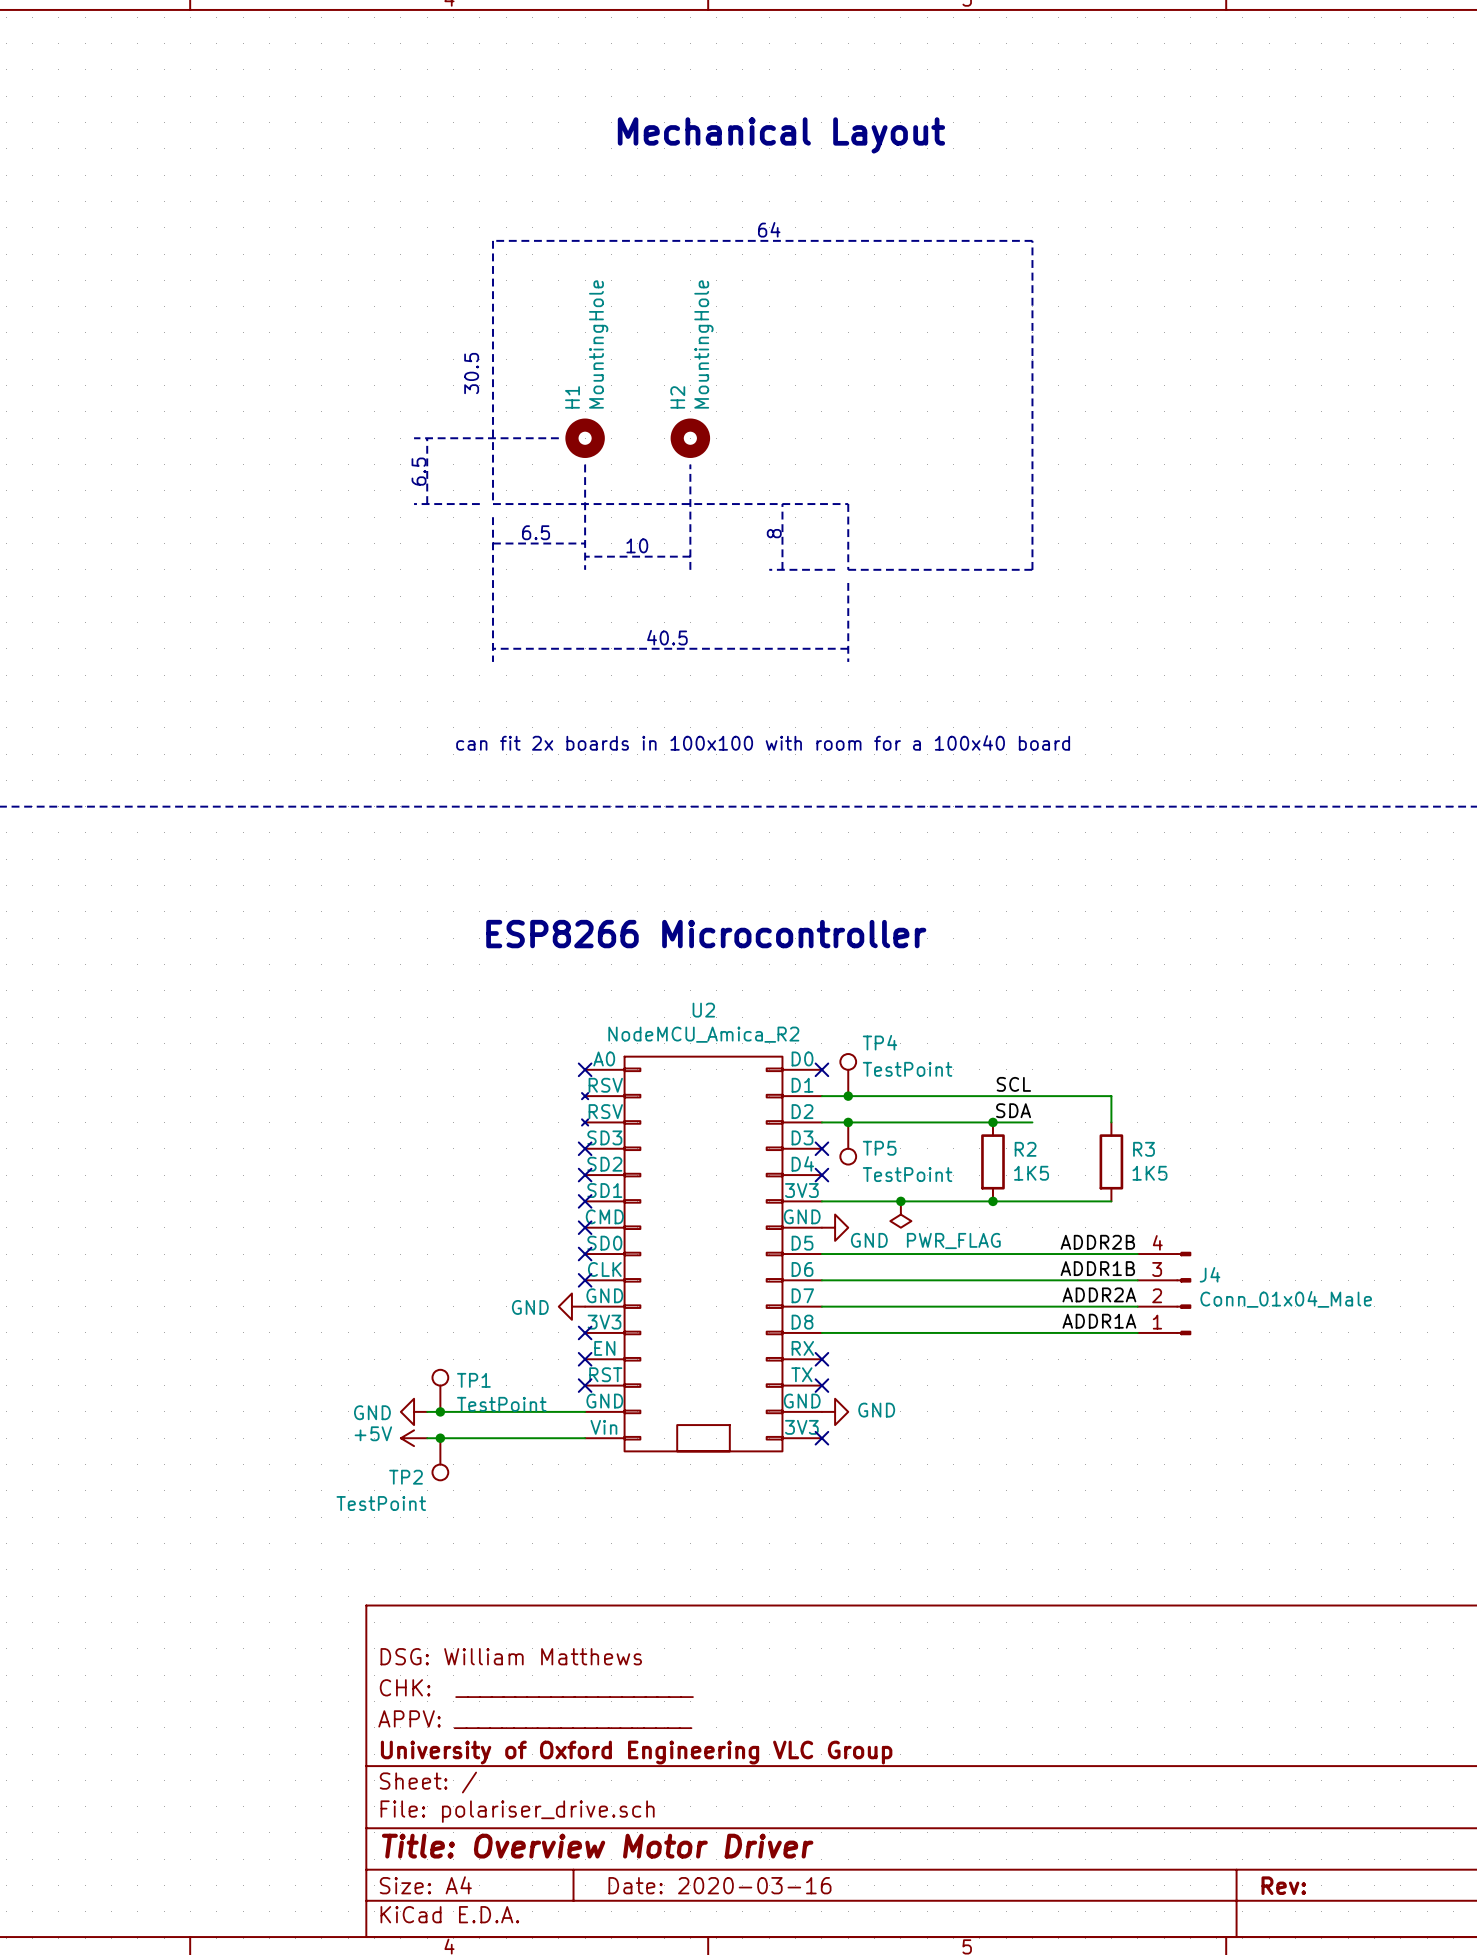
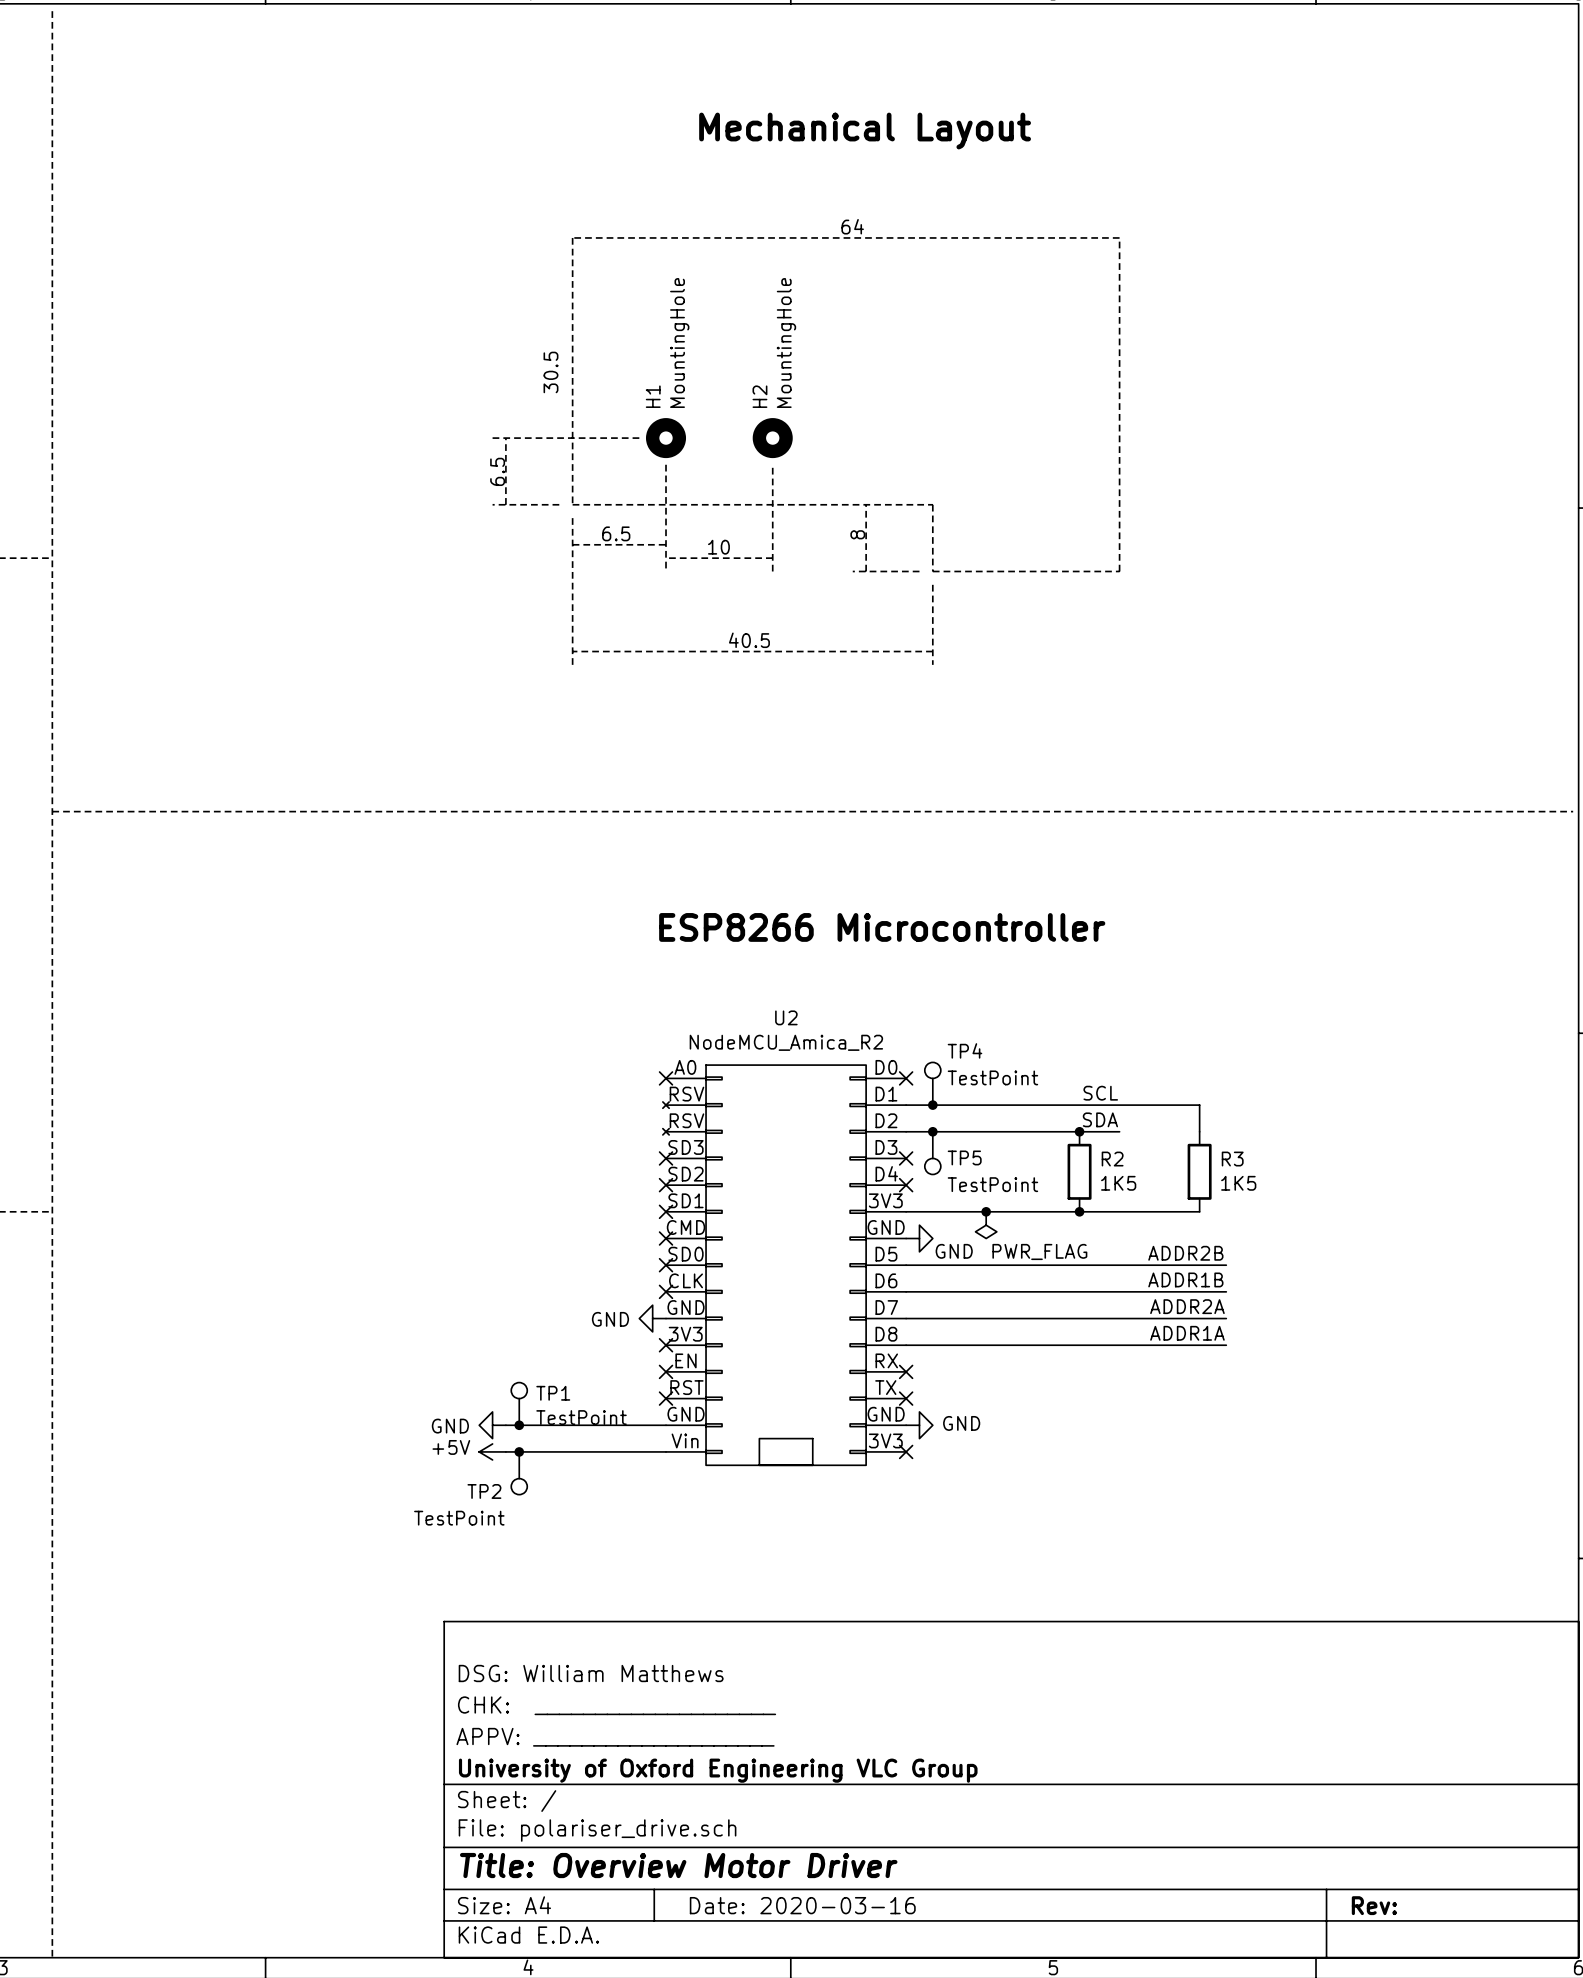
text: can fit 2x boards in 100x100 with room for a 100x40 board (763, 742) -> none
text position: ESP8266 Microcontroller (706, 934) -> ESP8266 Microcontroller (882, 927)
J4: Conn_01x04_Male (1164, 1293) -> none

